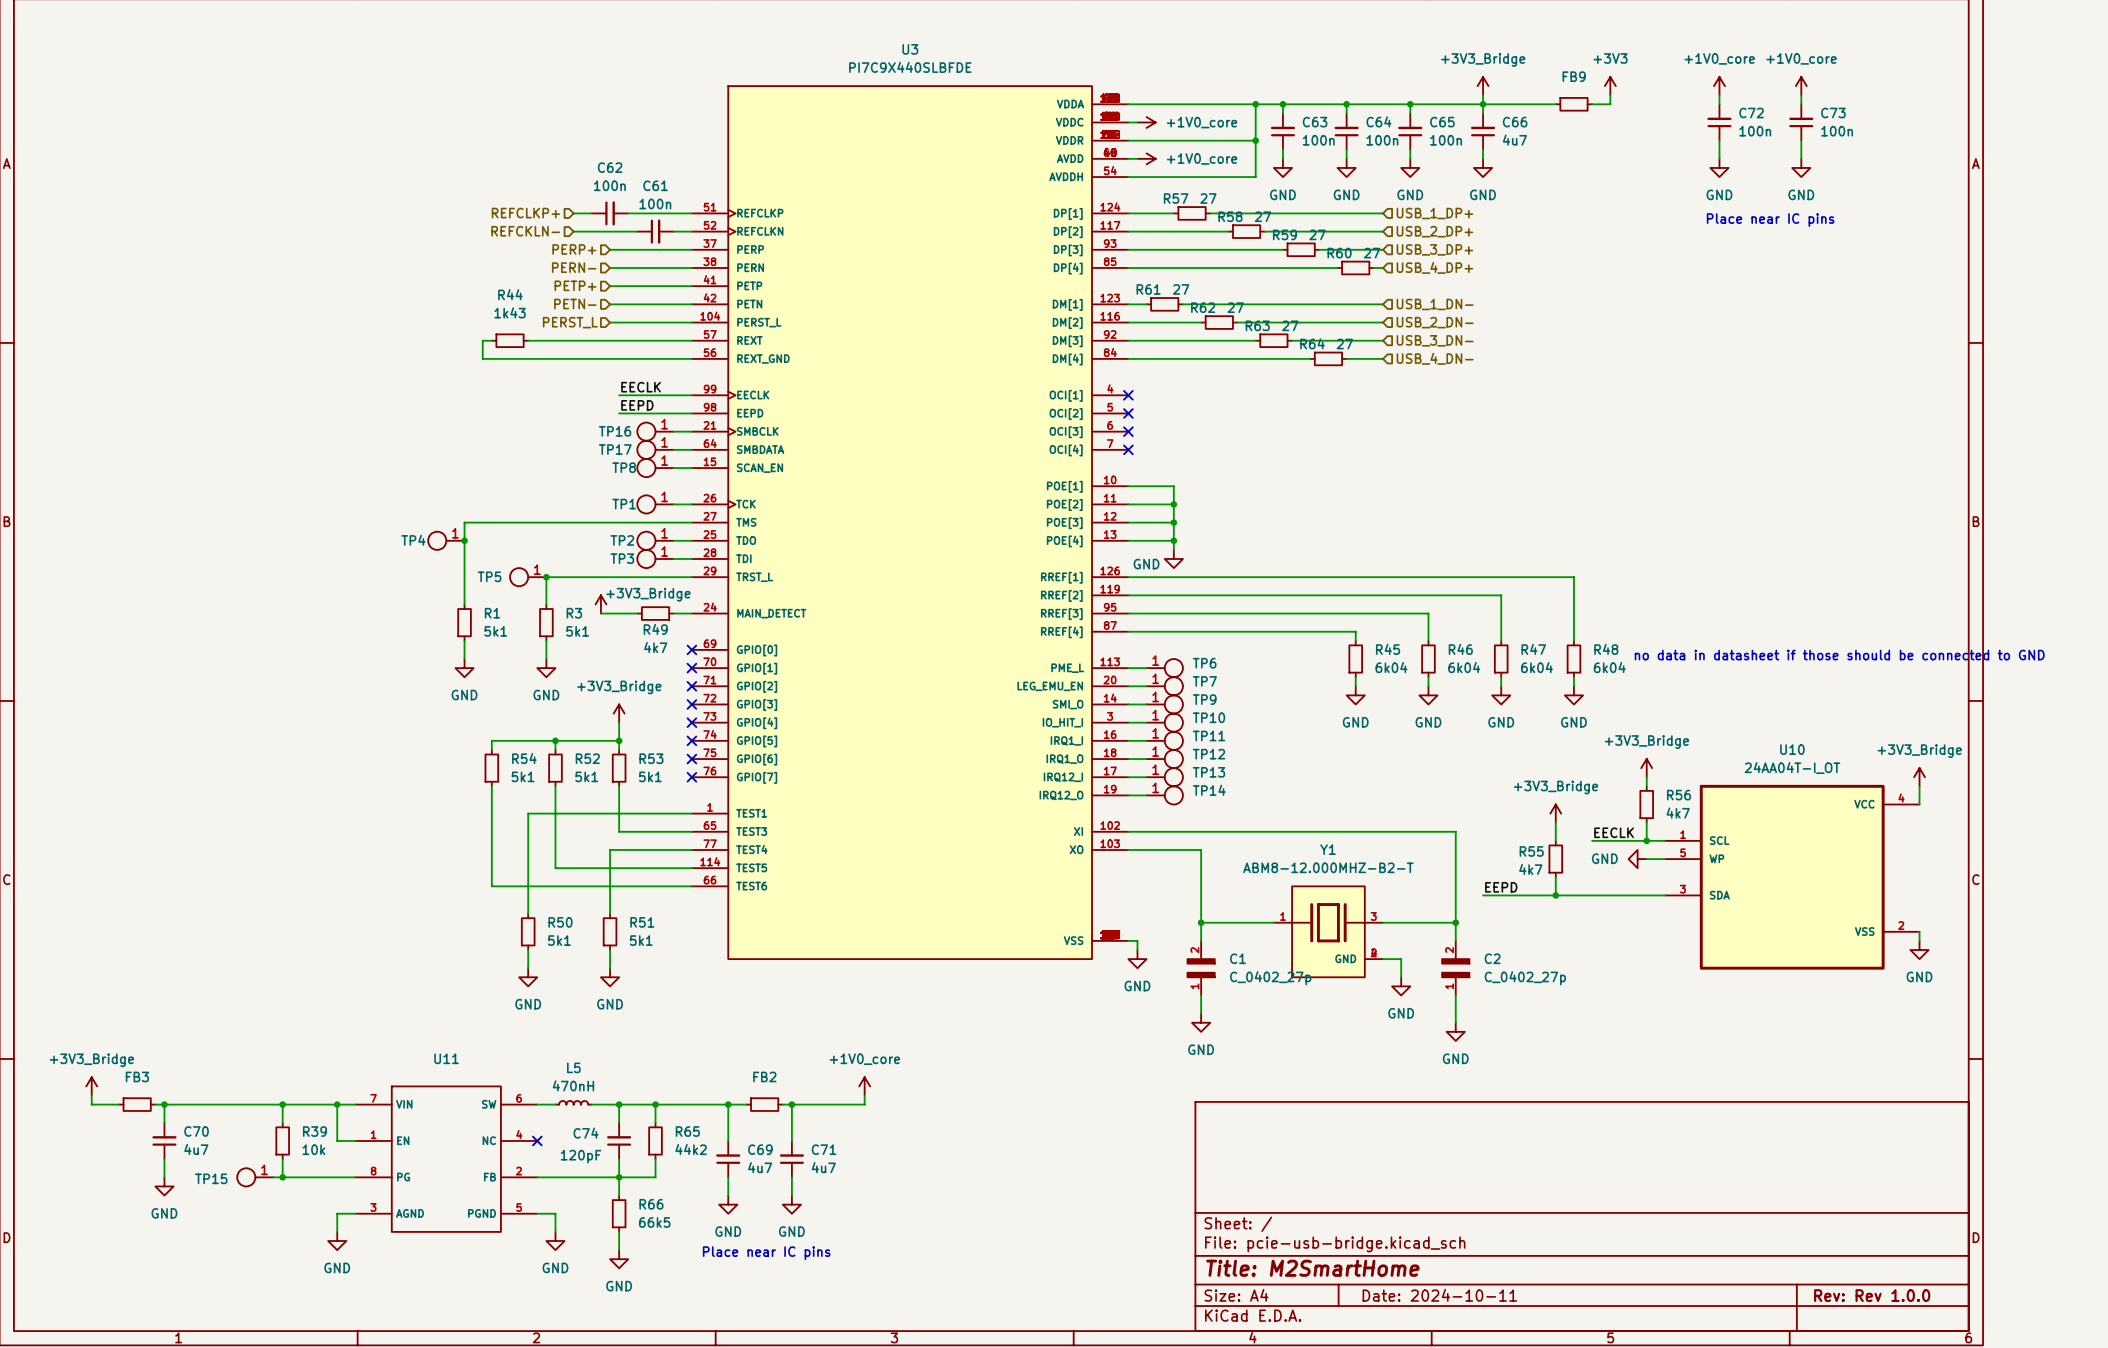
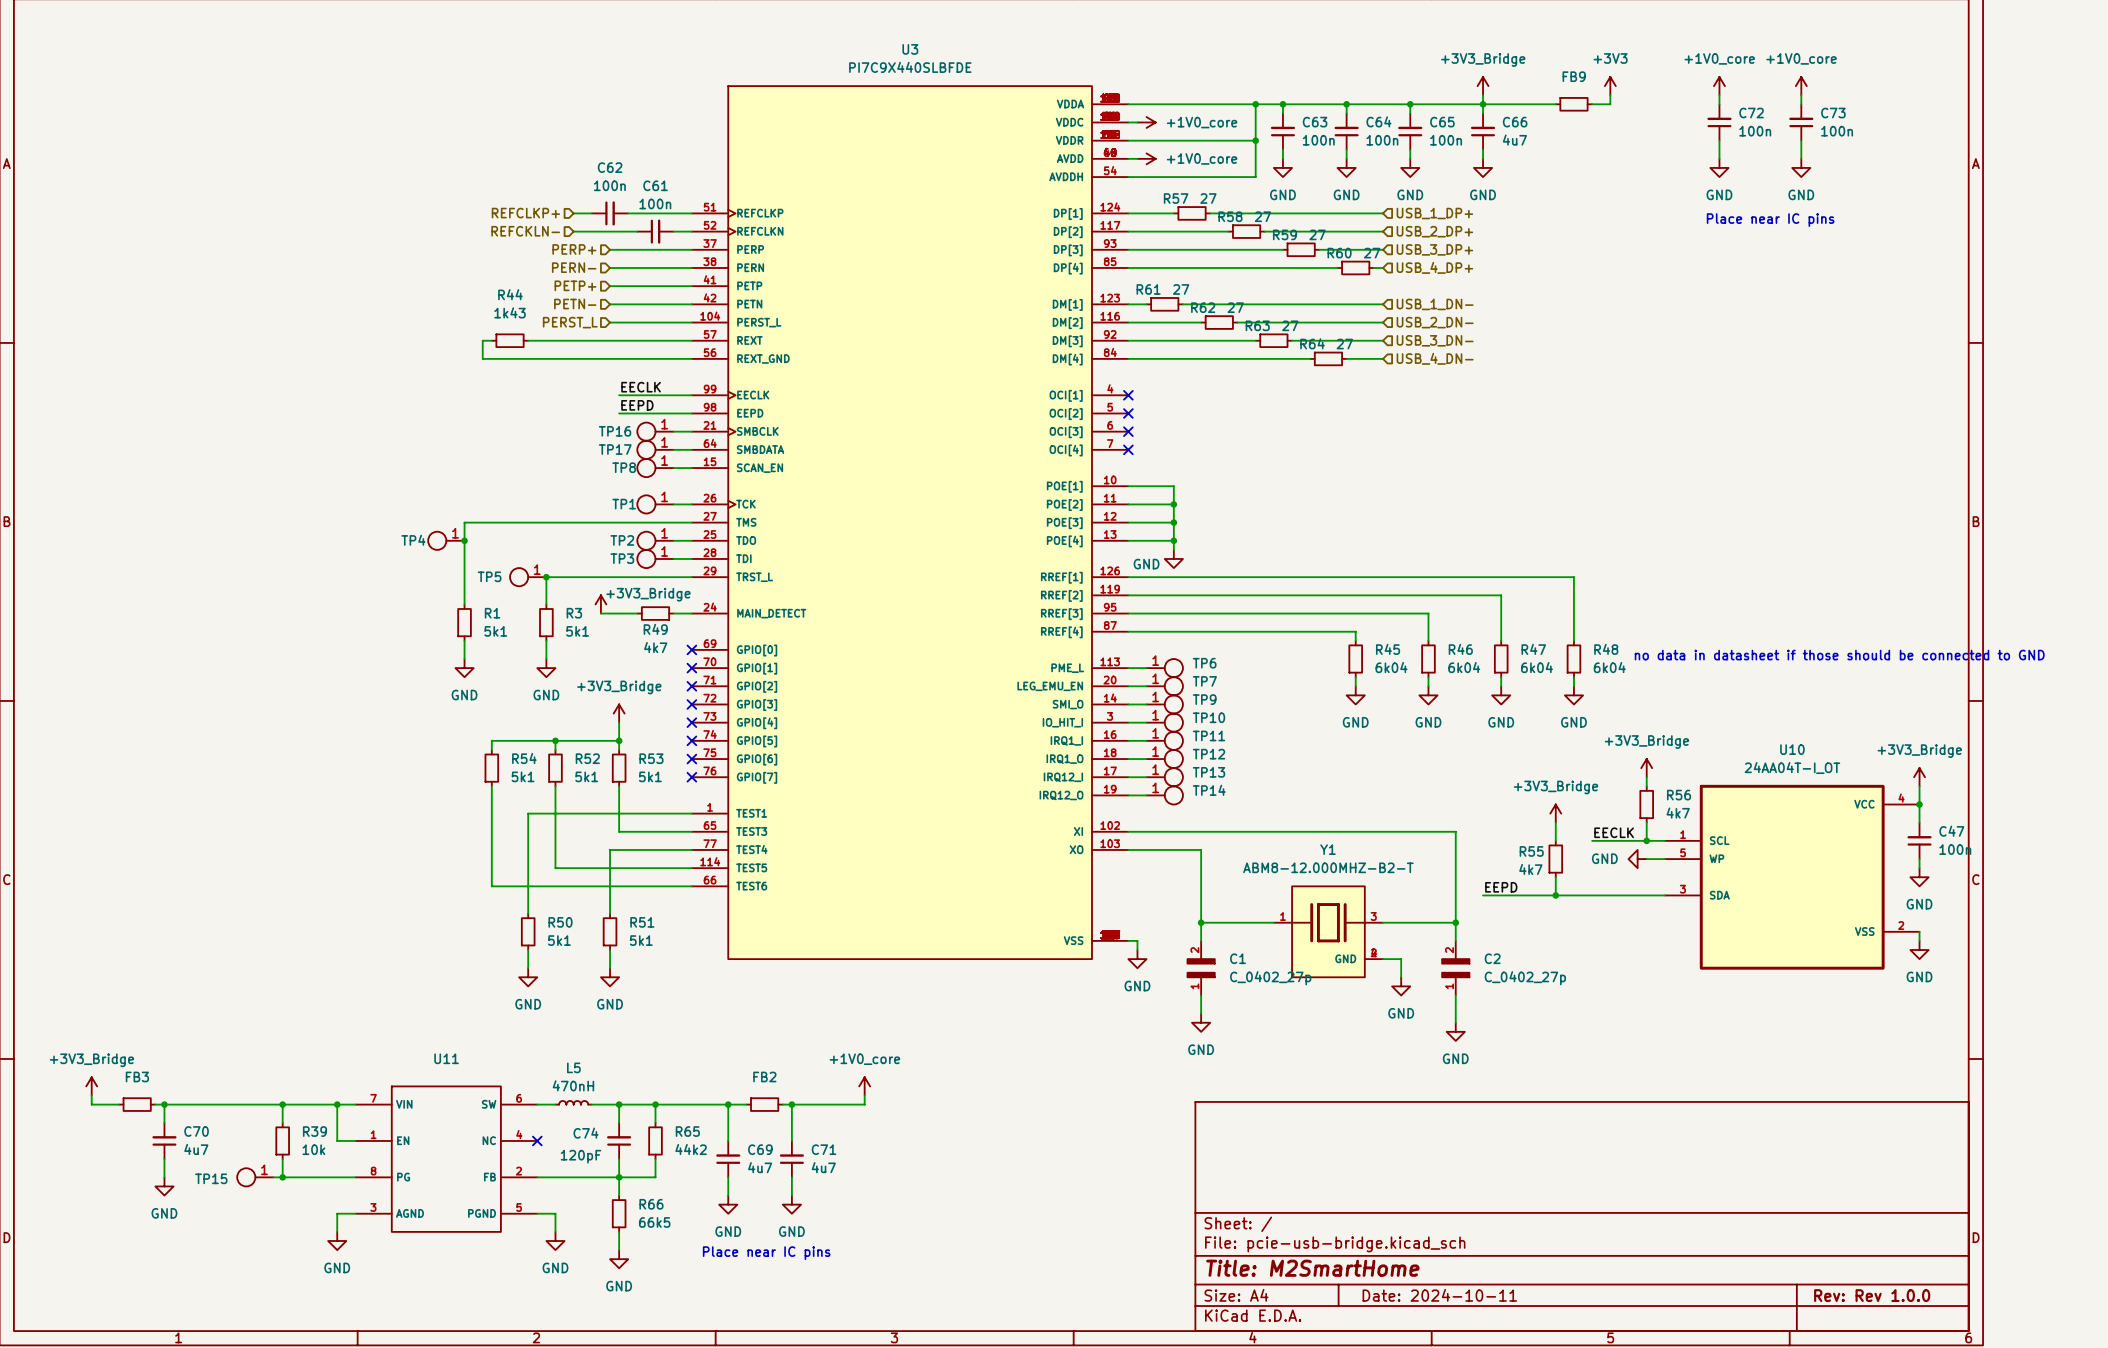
wire: none -> (1919, 804) (1919, 822)
junction: none -> (1919, 804)
C47: none -> (1919, 840)
wire: none -> (1919, 859) (1919, 868)
power symbol: none -> GND (1919, 877)

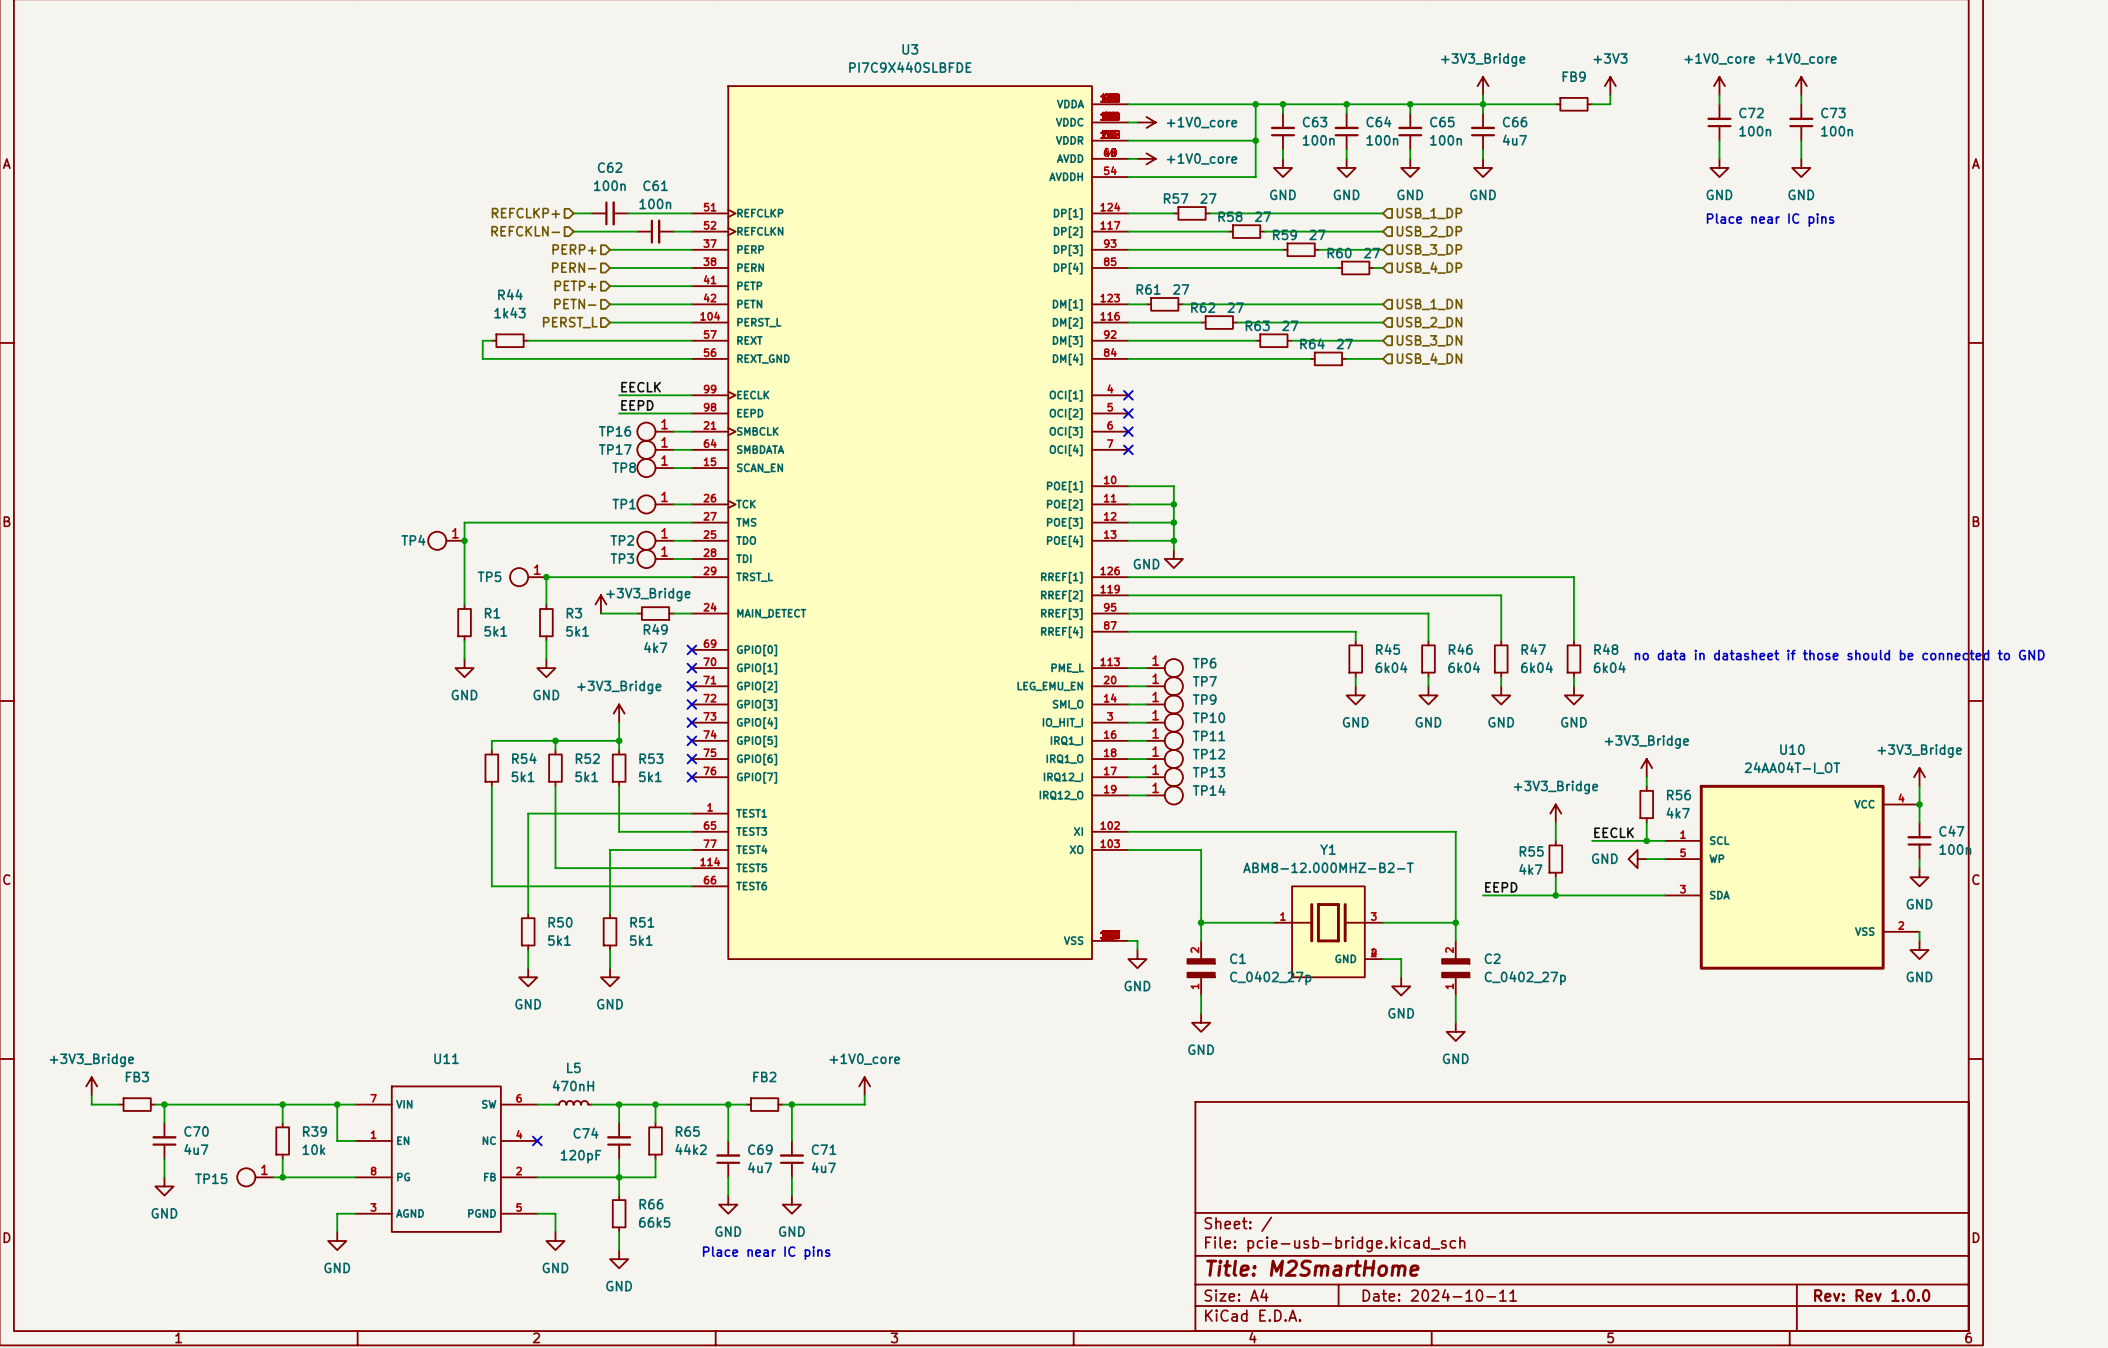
hierarchical label: USB_1_DP+ (1434, 213) -> USB_1_DP (1429, 213)
hierarchical label: USB_2_DP+ (1434, 231) -> USB_2_DP (1429, 231)
hierarchical label: USB_3_DP+ (1434, 249) -> USB_3_DP (1429, 249)
hierarchical label: USB_4_DP+ (1434, 267) -> USB_4_DP (1429, 267)
hierarchical label: USB_1_DN- (1435, 304) -> USB_1_DN (1429, 304)
hierarchical label: USB_2_DN- (1435, 322) -> USB_2_DN (1429, 322)
hierarchical label: USB_3_DN- (1435, 340) -> USB_3_DN (1429, 340)
hierarchical label: USB_4_DN- (1435, 358) -> USB_4_DN (1429, 358)

